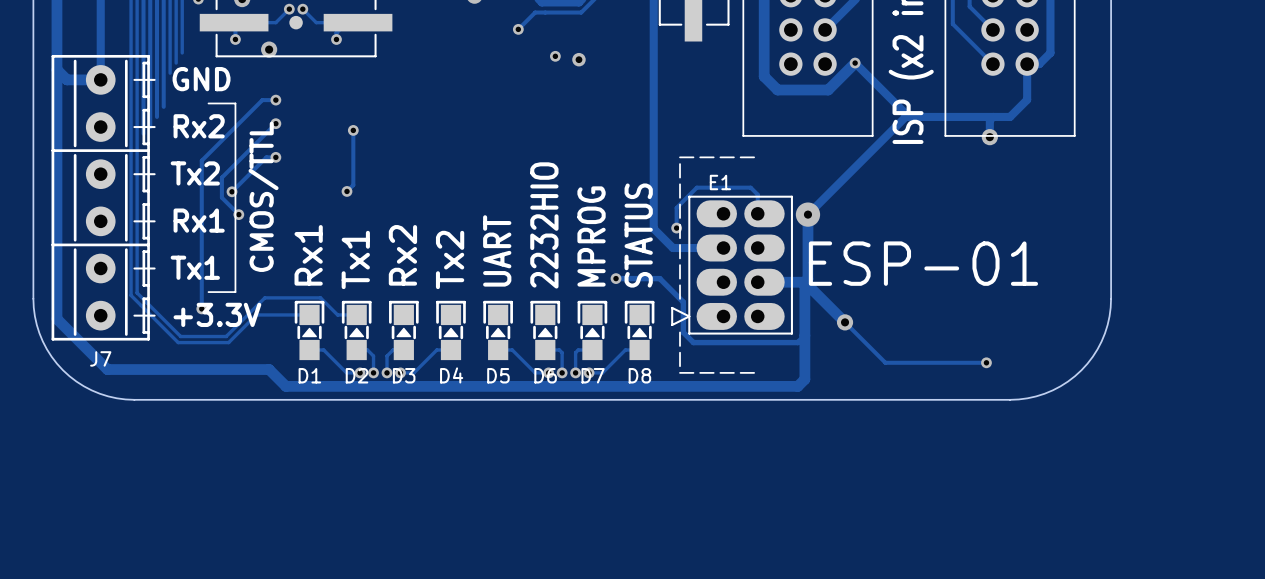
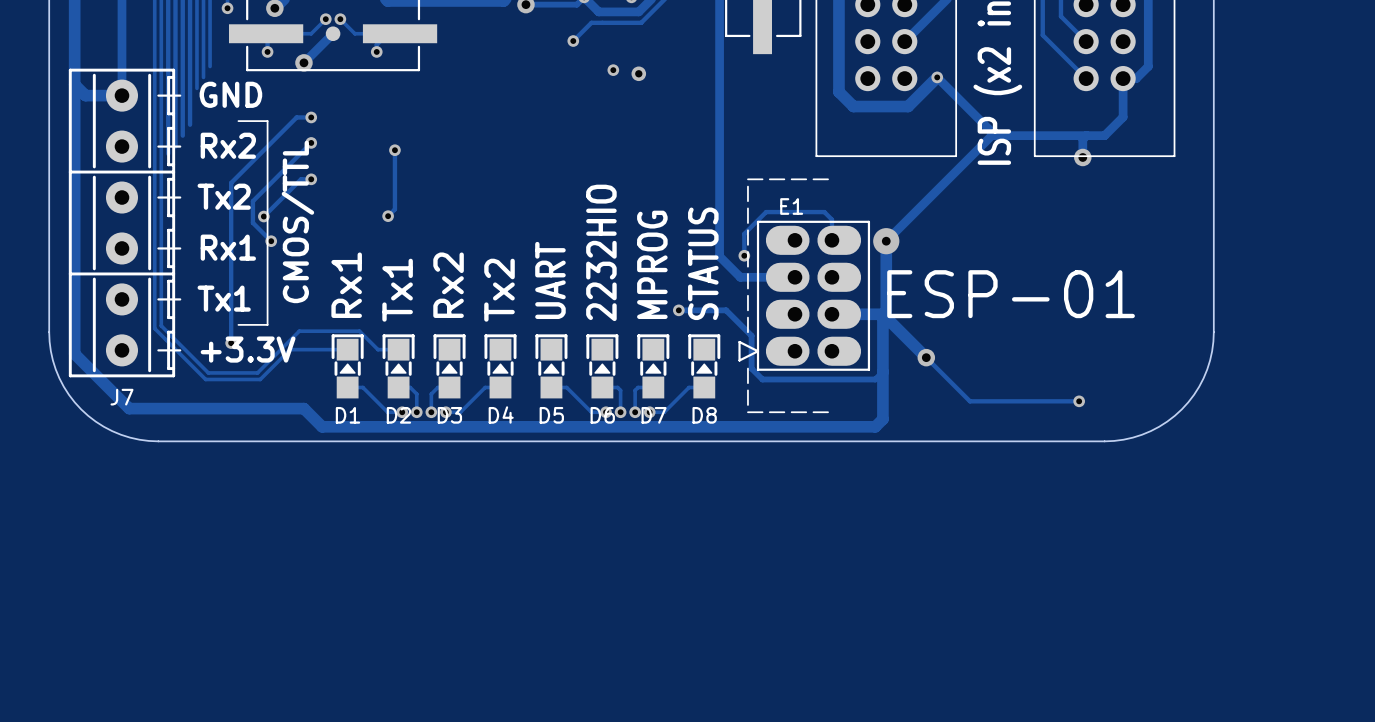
track: none -> (333, 33) (303, 62)

